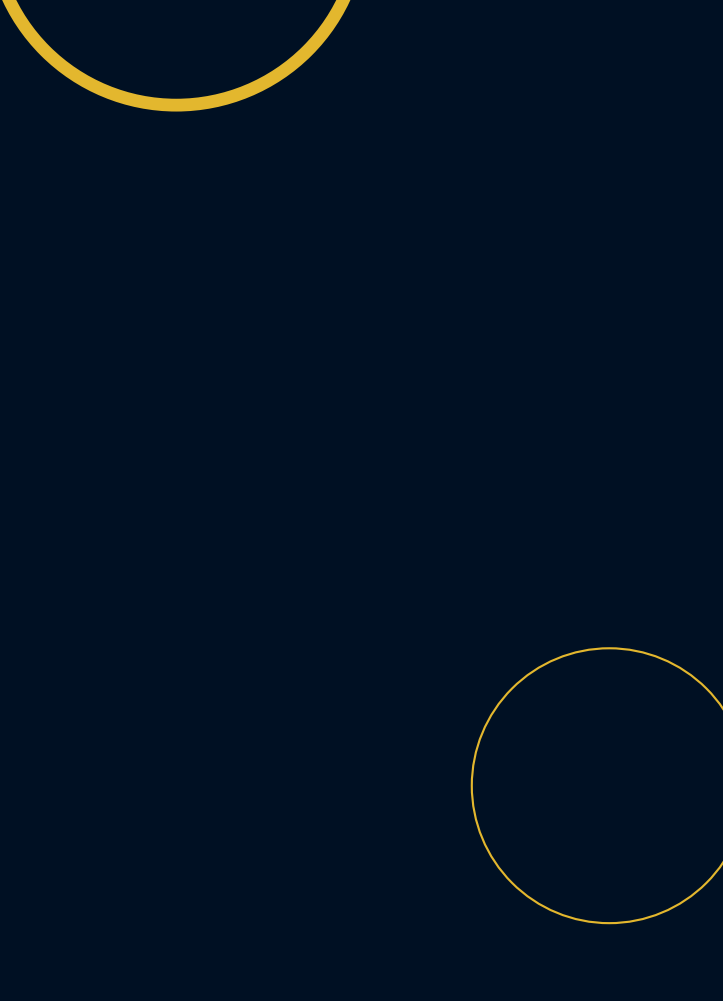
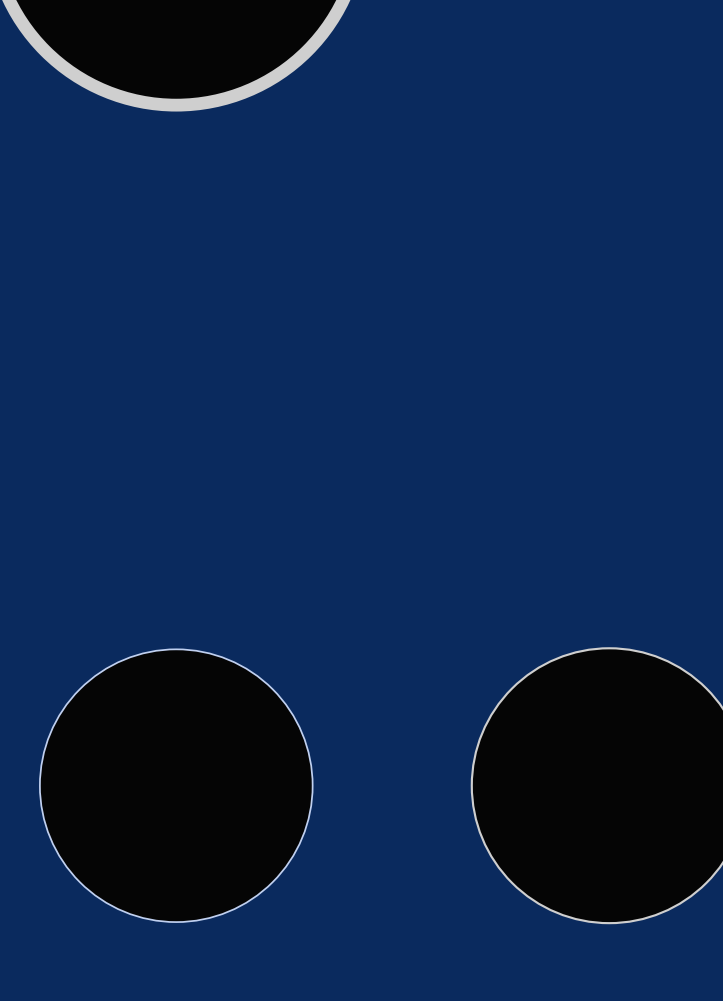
part: none -> (176, 785)

